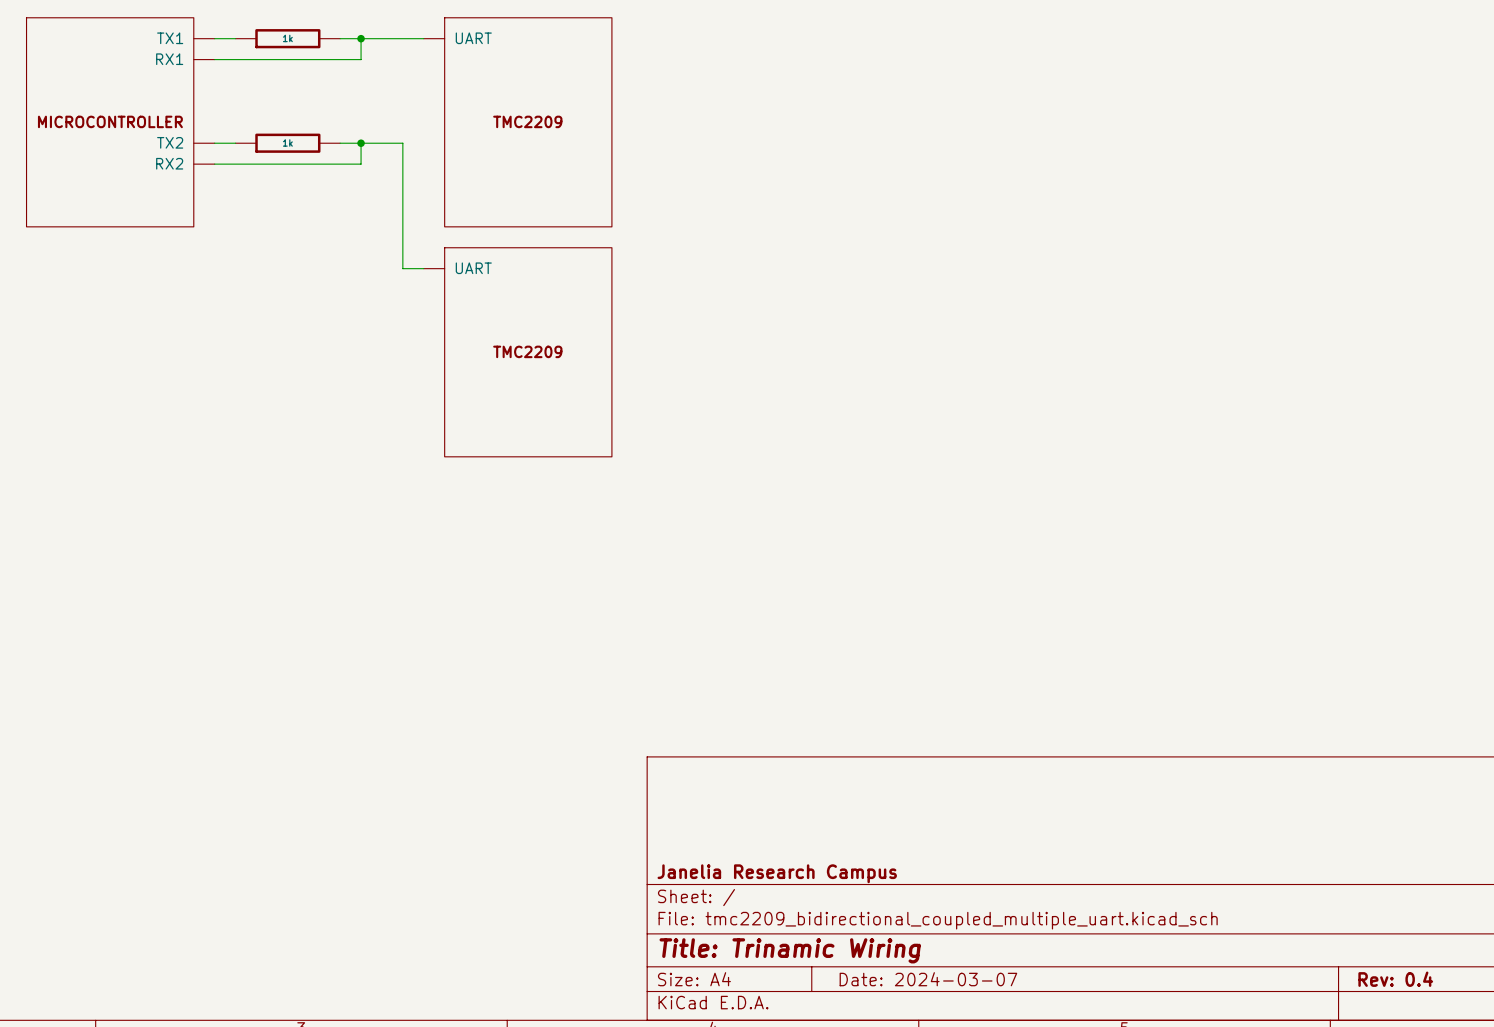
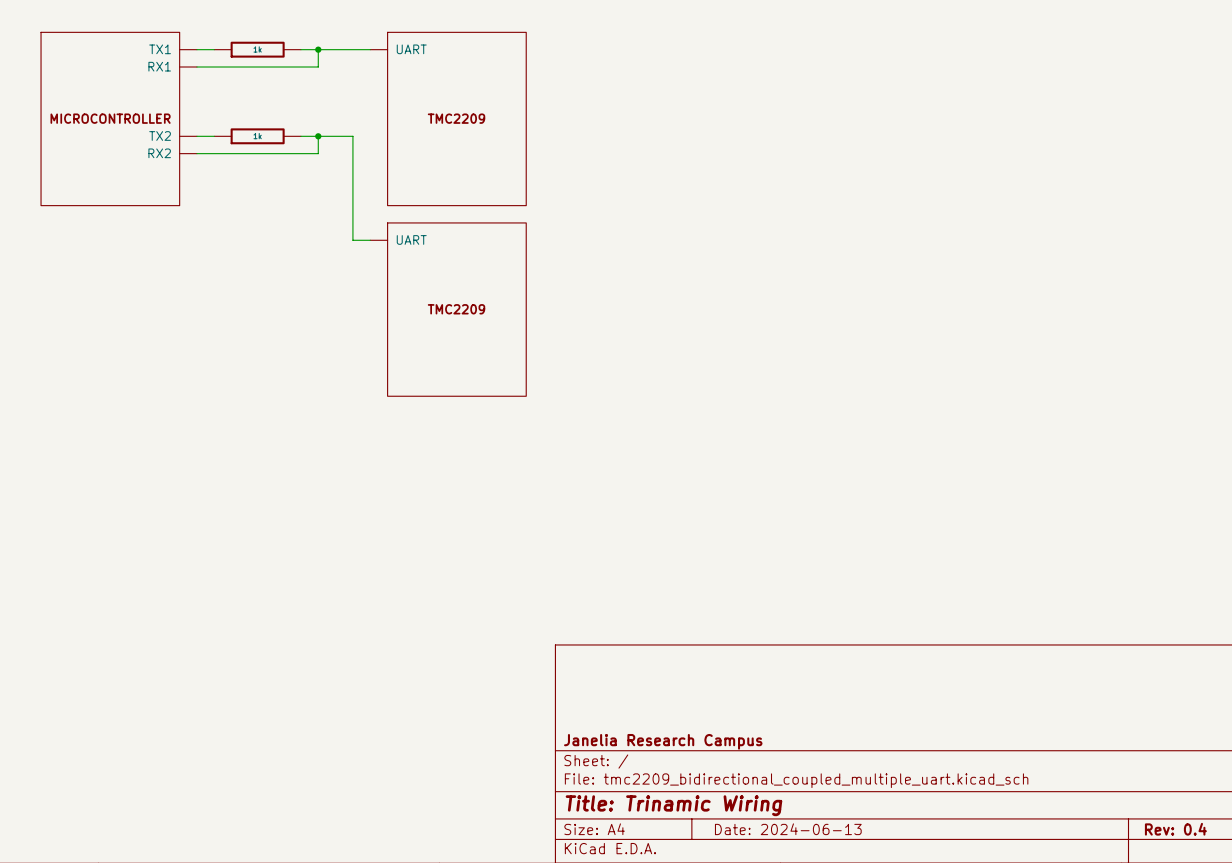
title block: Date: 2024-03-07 (928, 979) -> Date: 2024-06-13 (788, 829)

